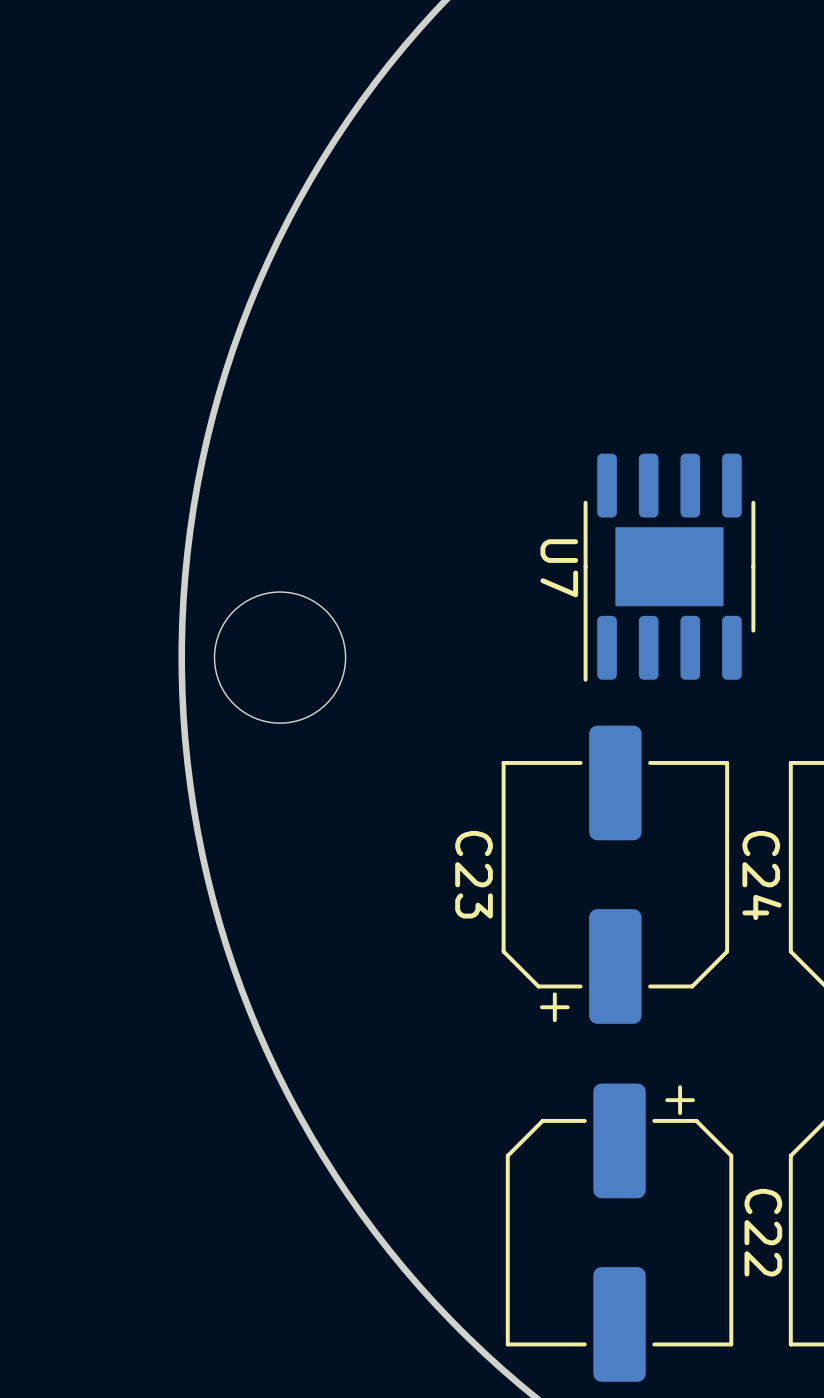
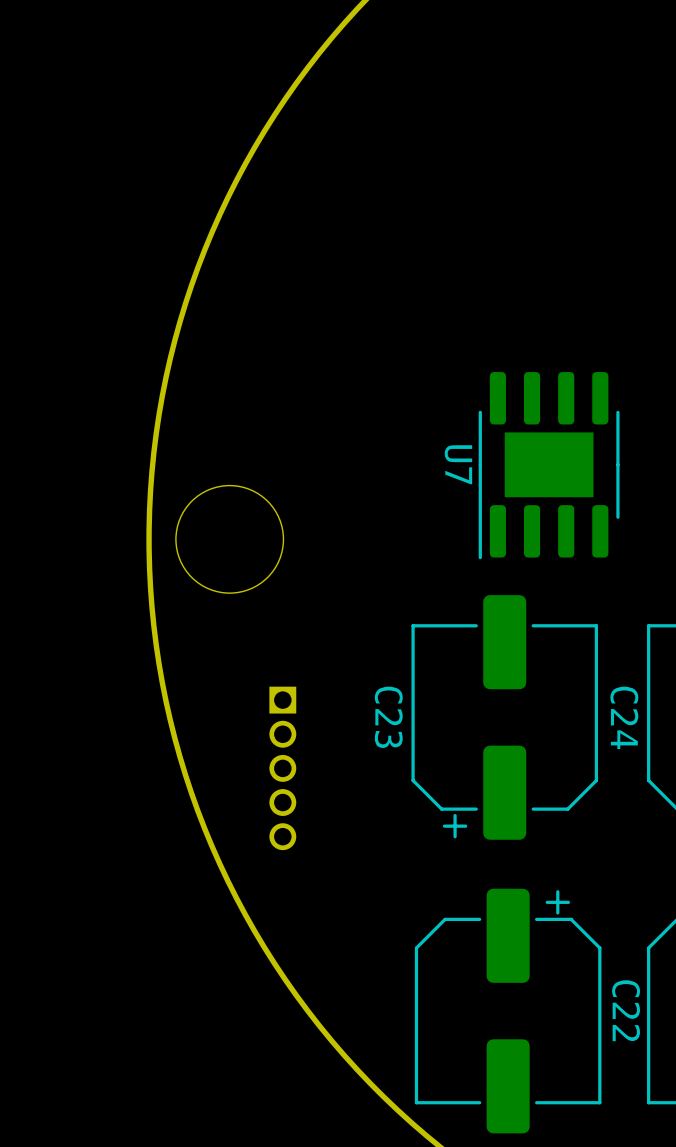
part: none -> (282, 768)

